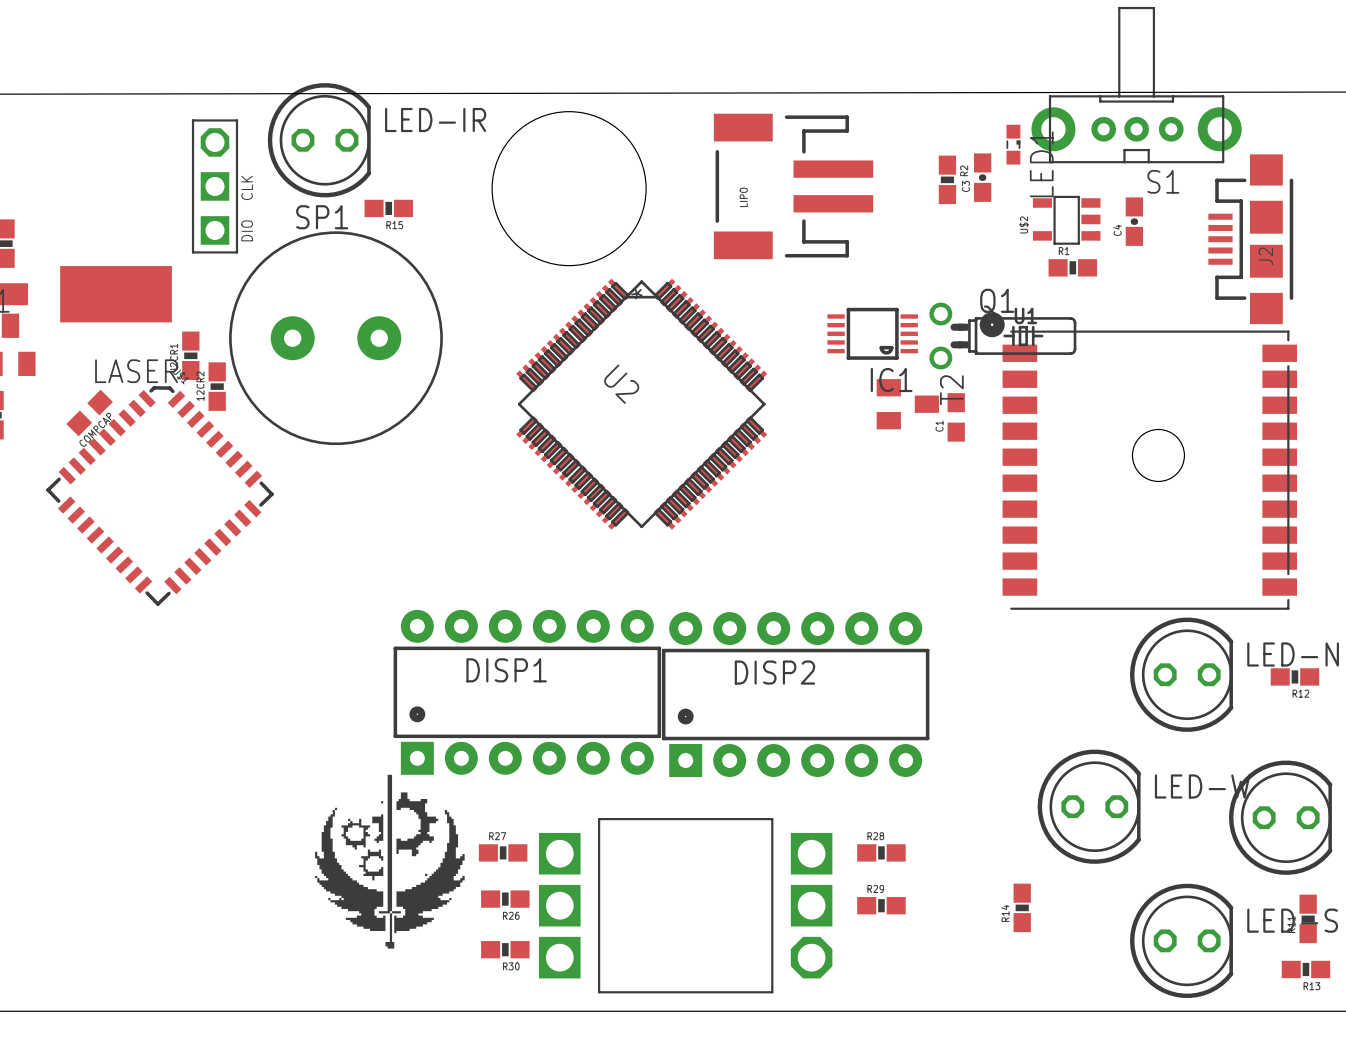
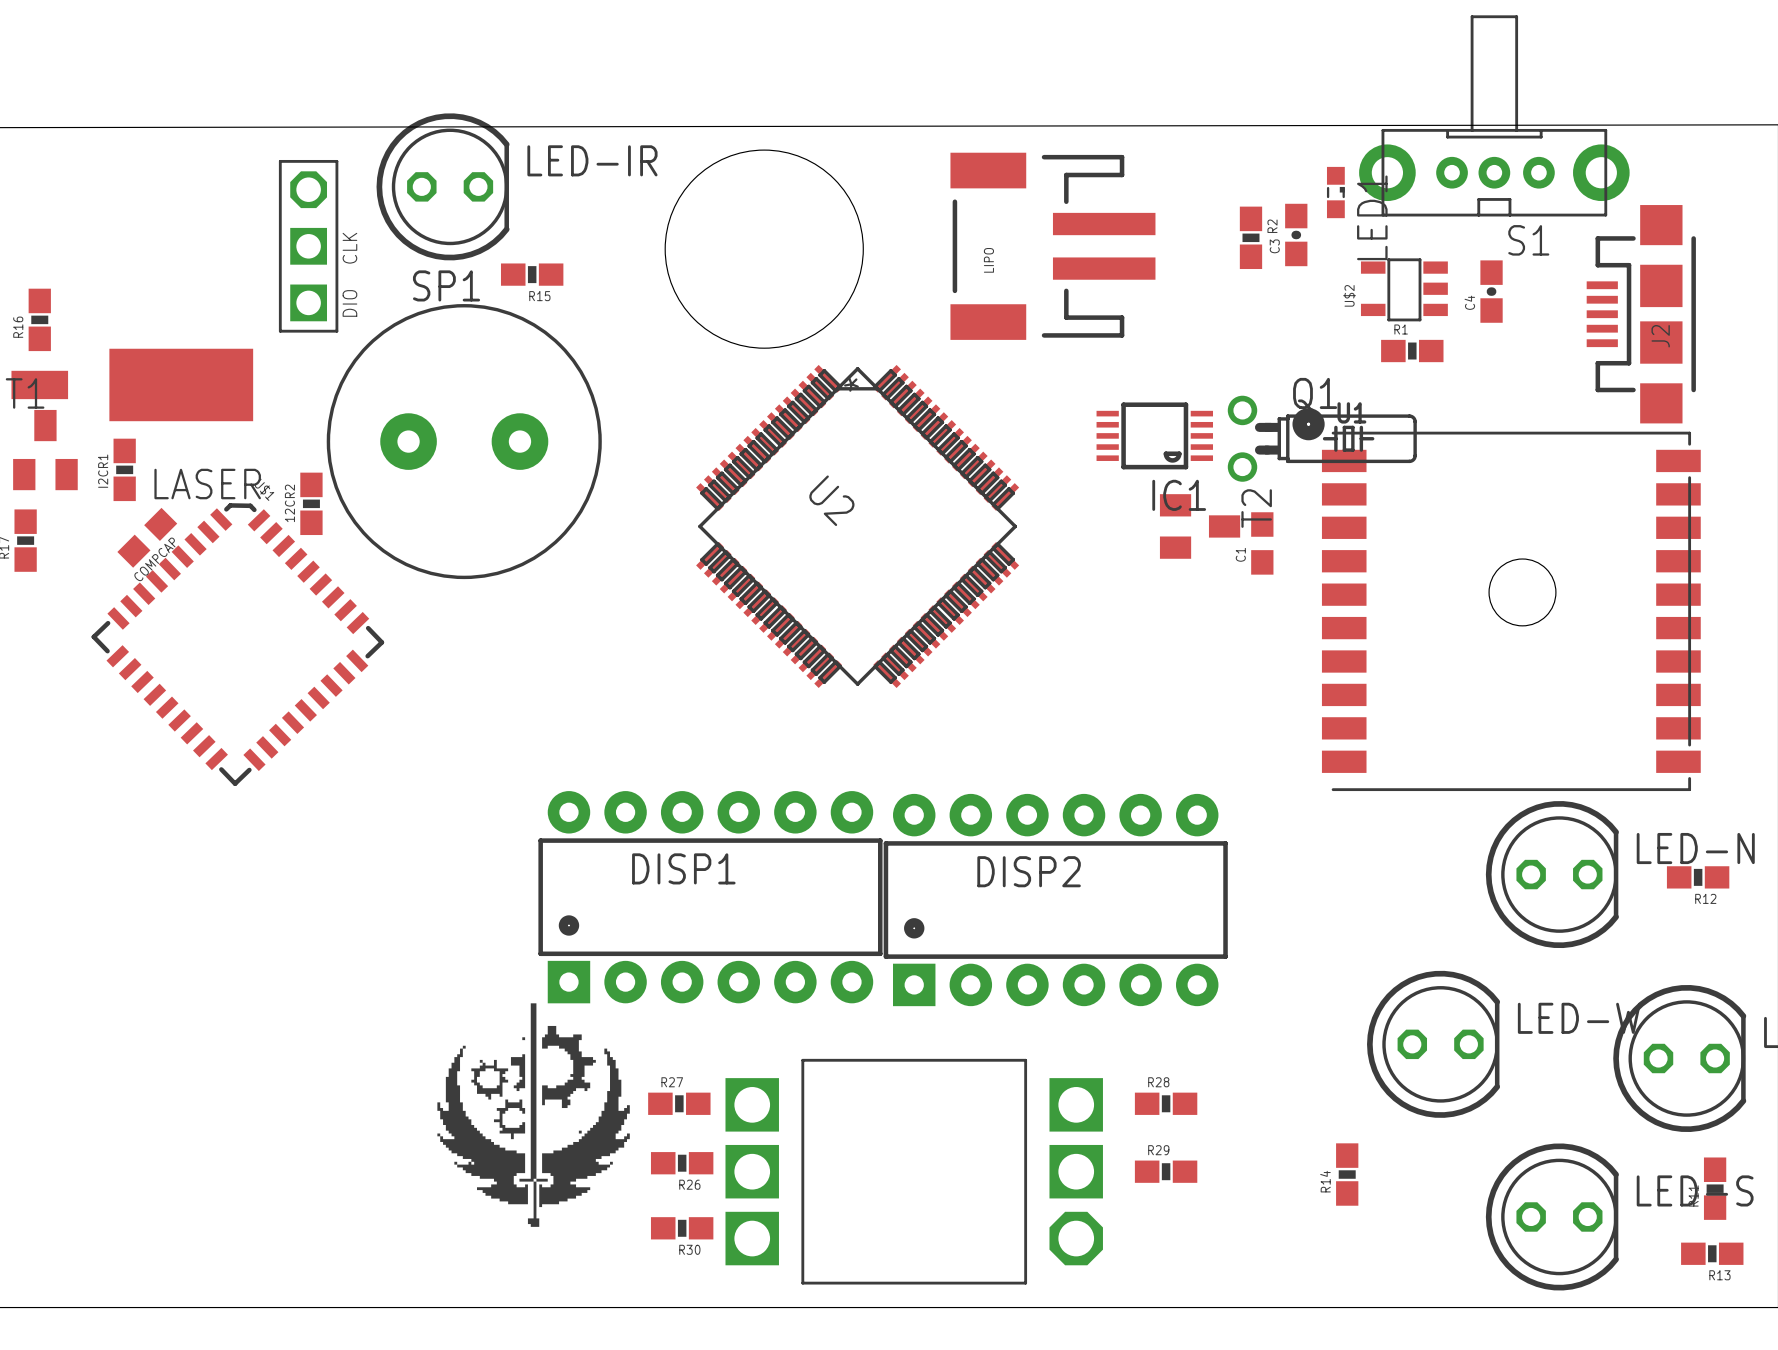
I2CR1 position: (190, 355) -> (124, 469)

